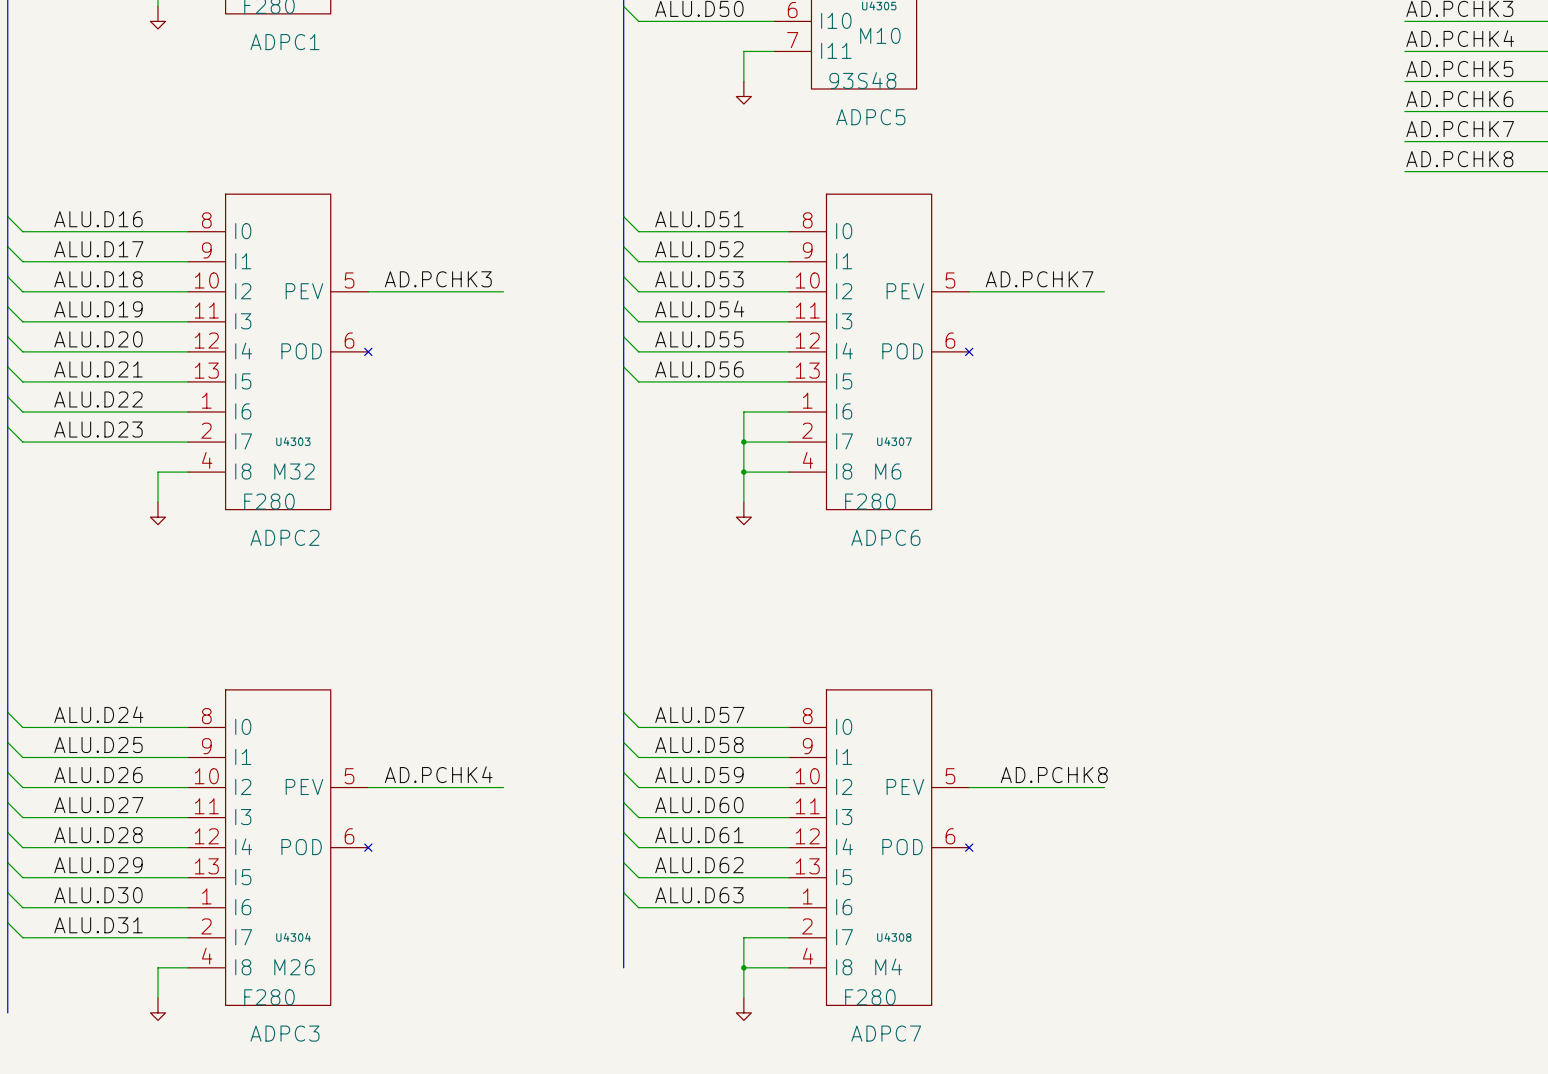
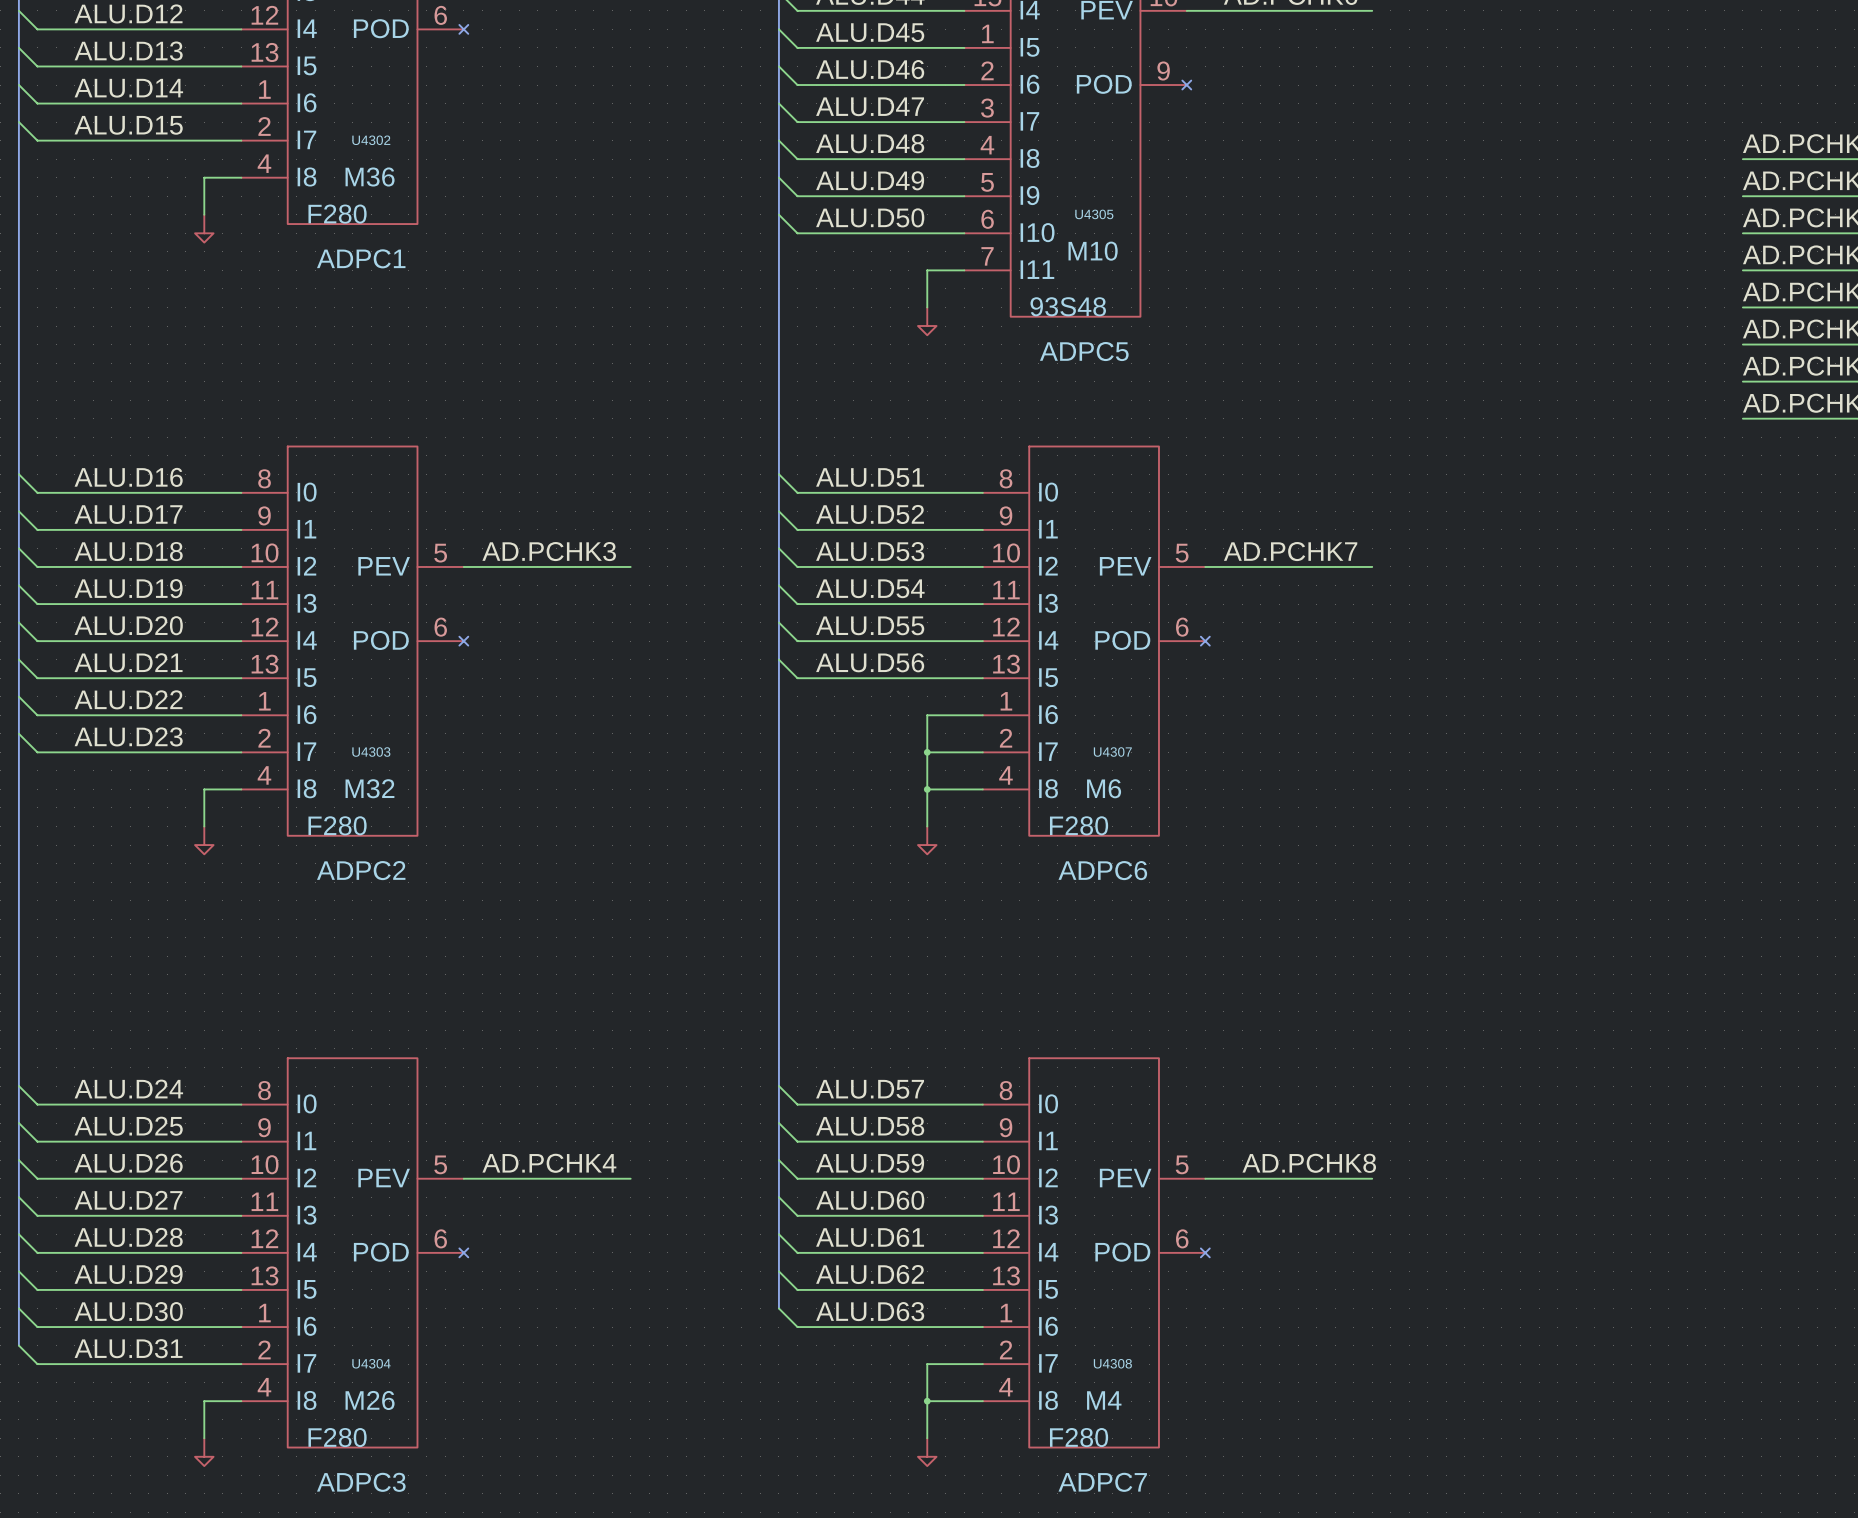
bus: (623, 892) (623, 967) -> none
bus: (7, 922) (7, 1012) -> none

